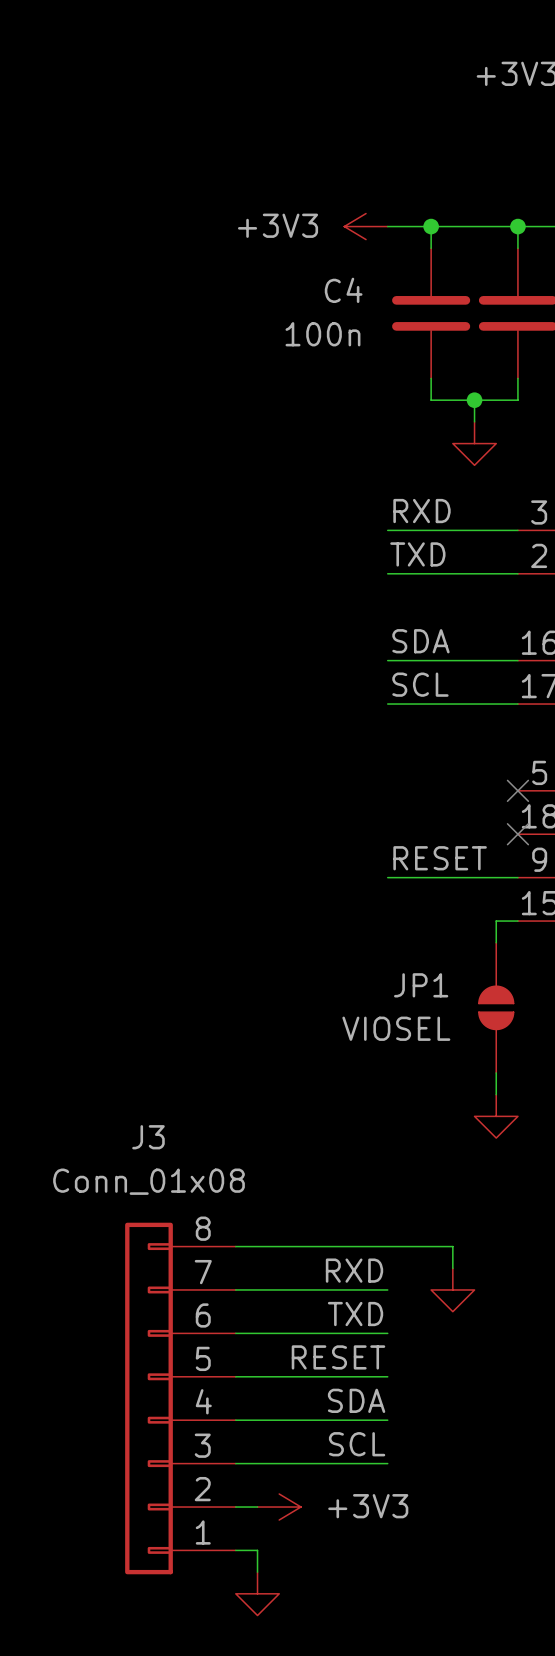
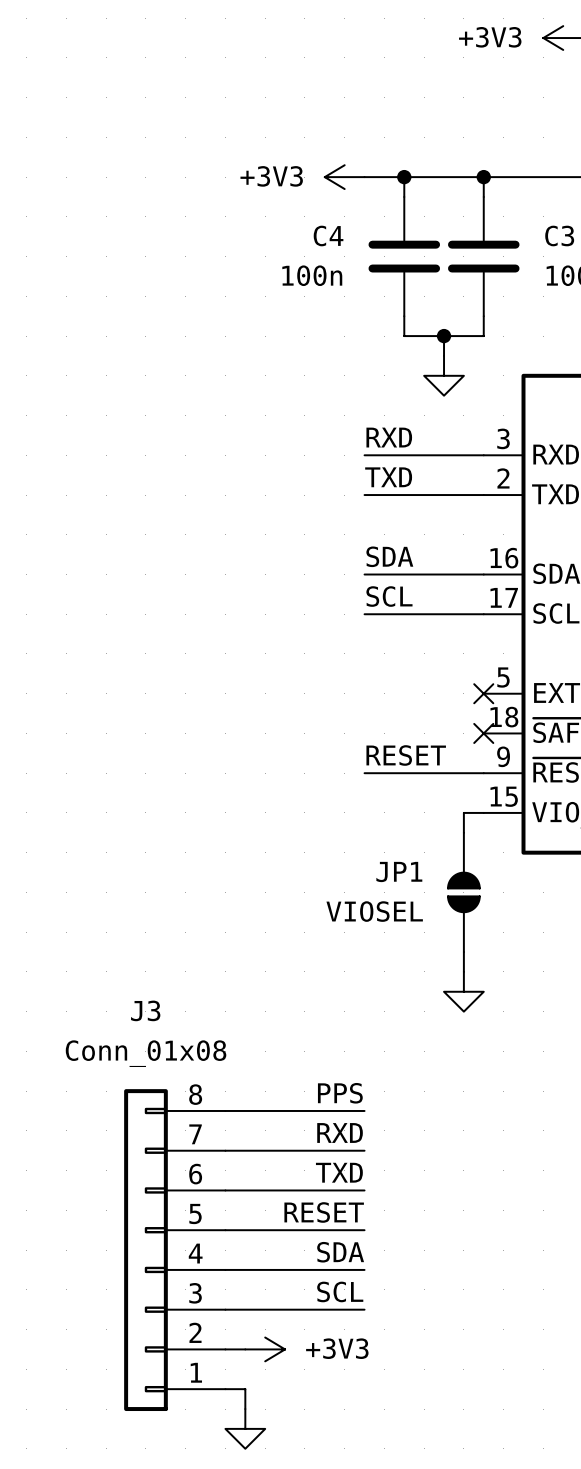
label: none -> PPS (340, 1093)
wire: (387, 1246) (452, 1246) (452, 1268) -> none
power symbol: (452, 1289) -> none

